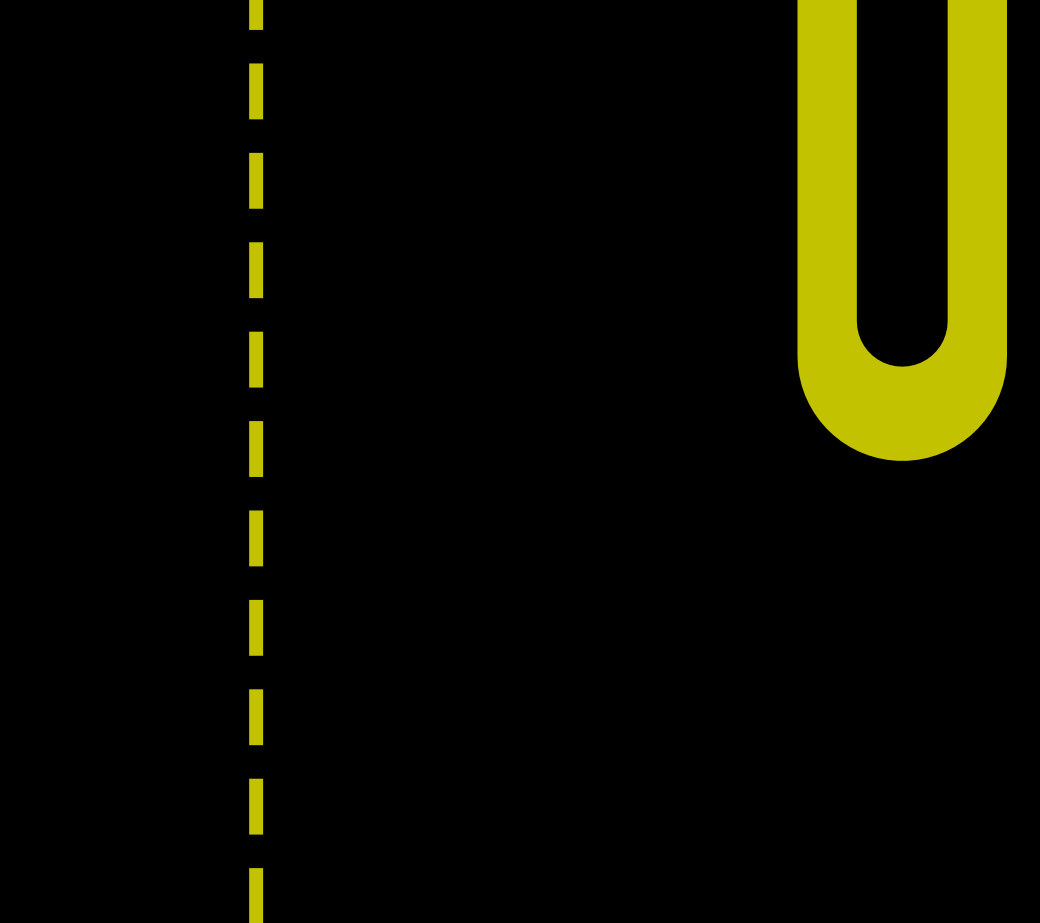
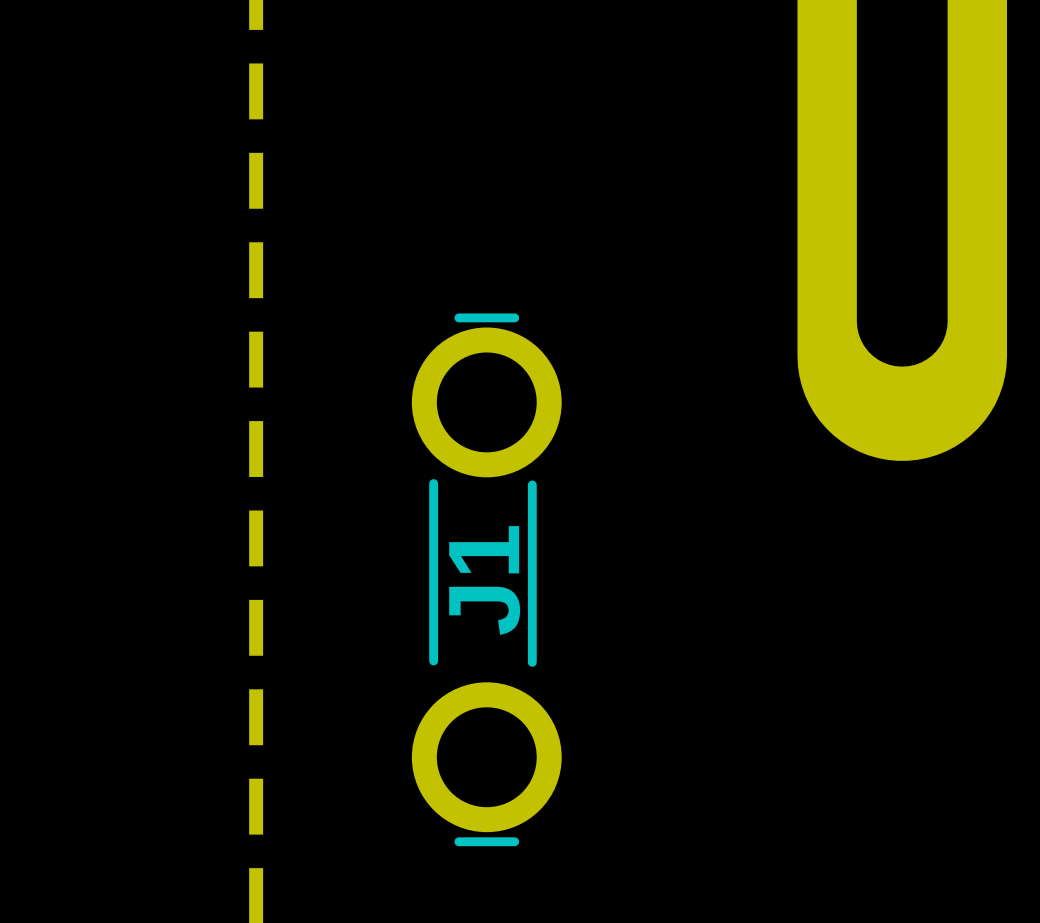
J1: none -> (486, 579)

